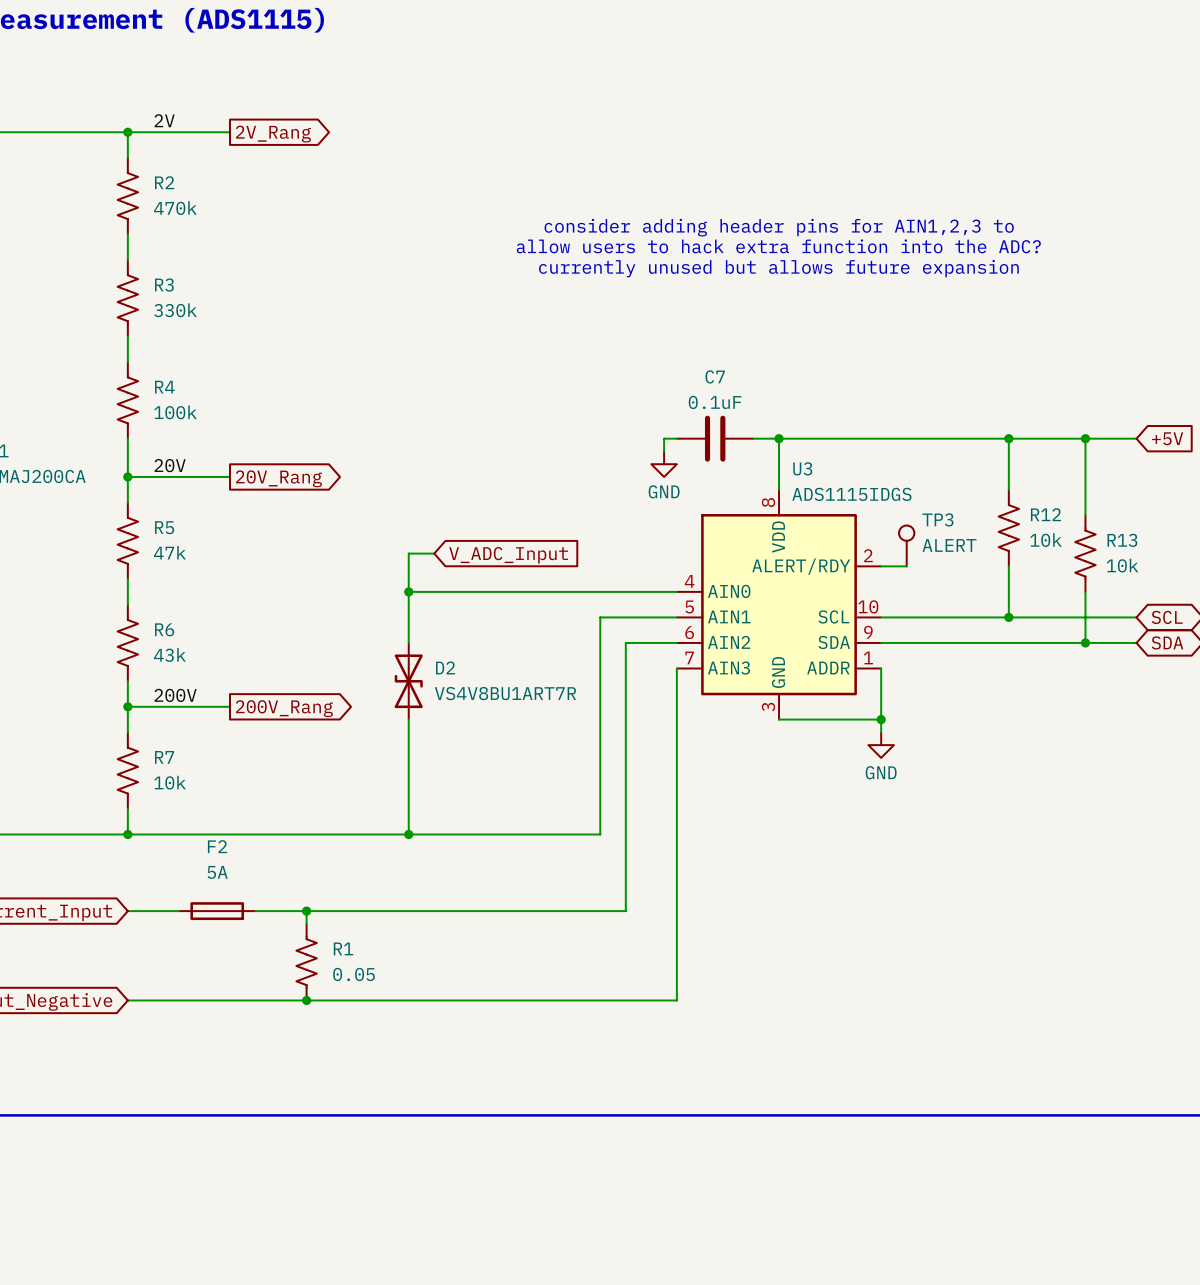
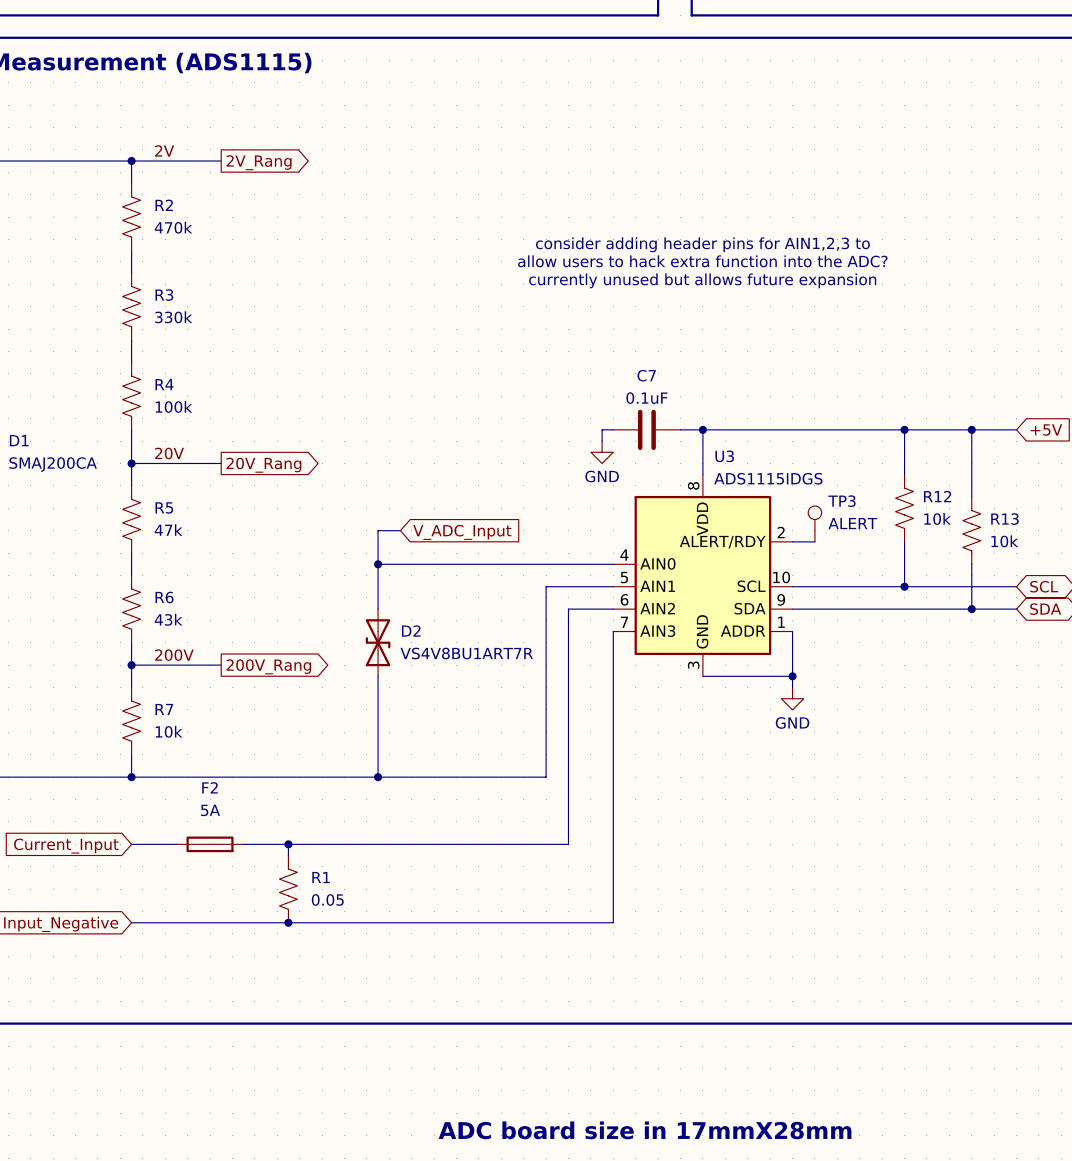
text: none -> ADC board size in 17mmX28mm (645, 1130)

